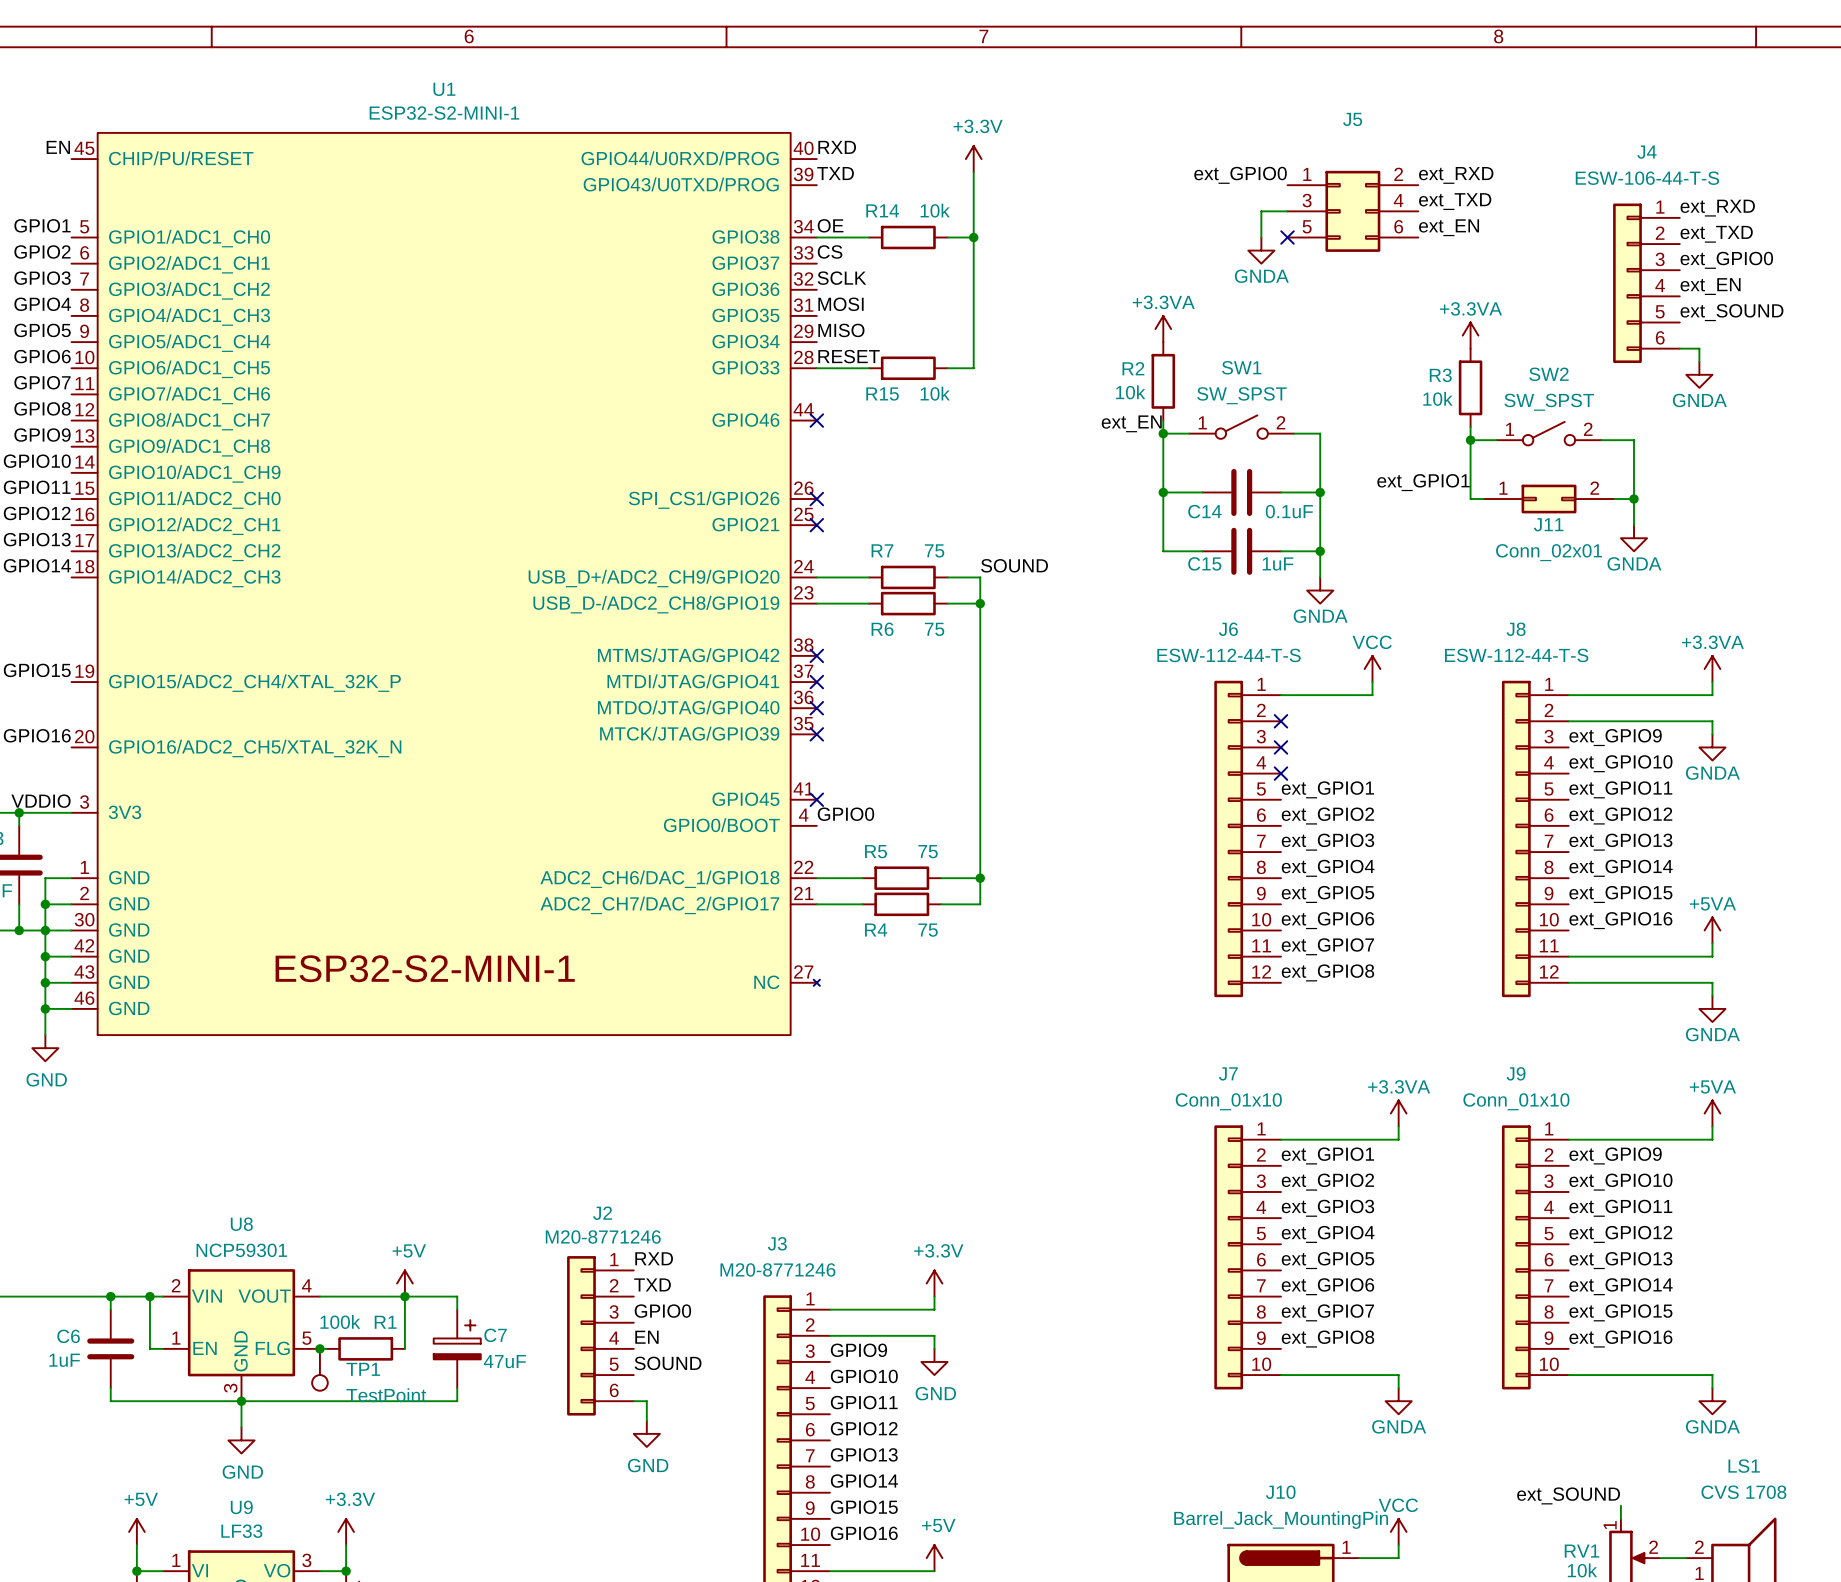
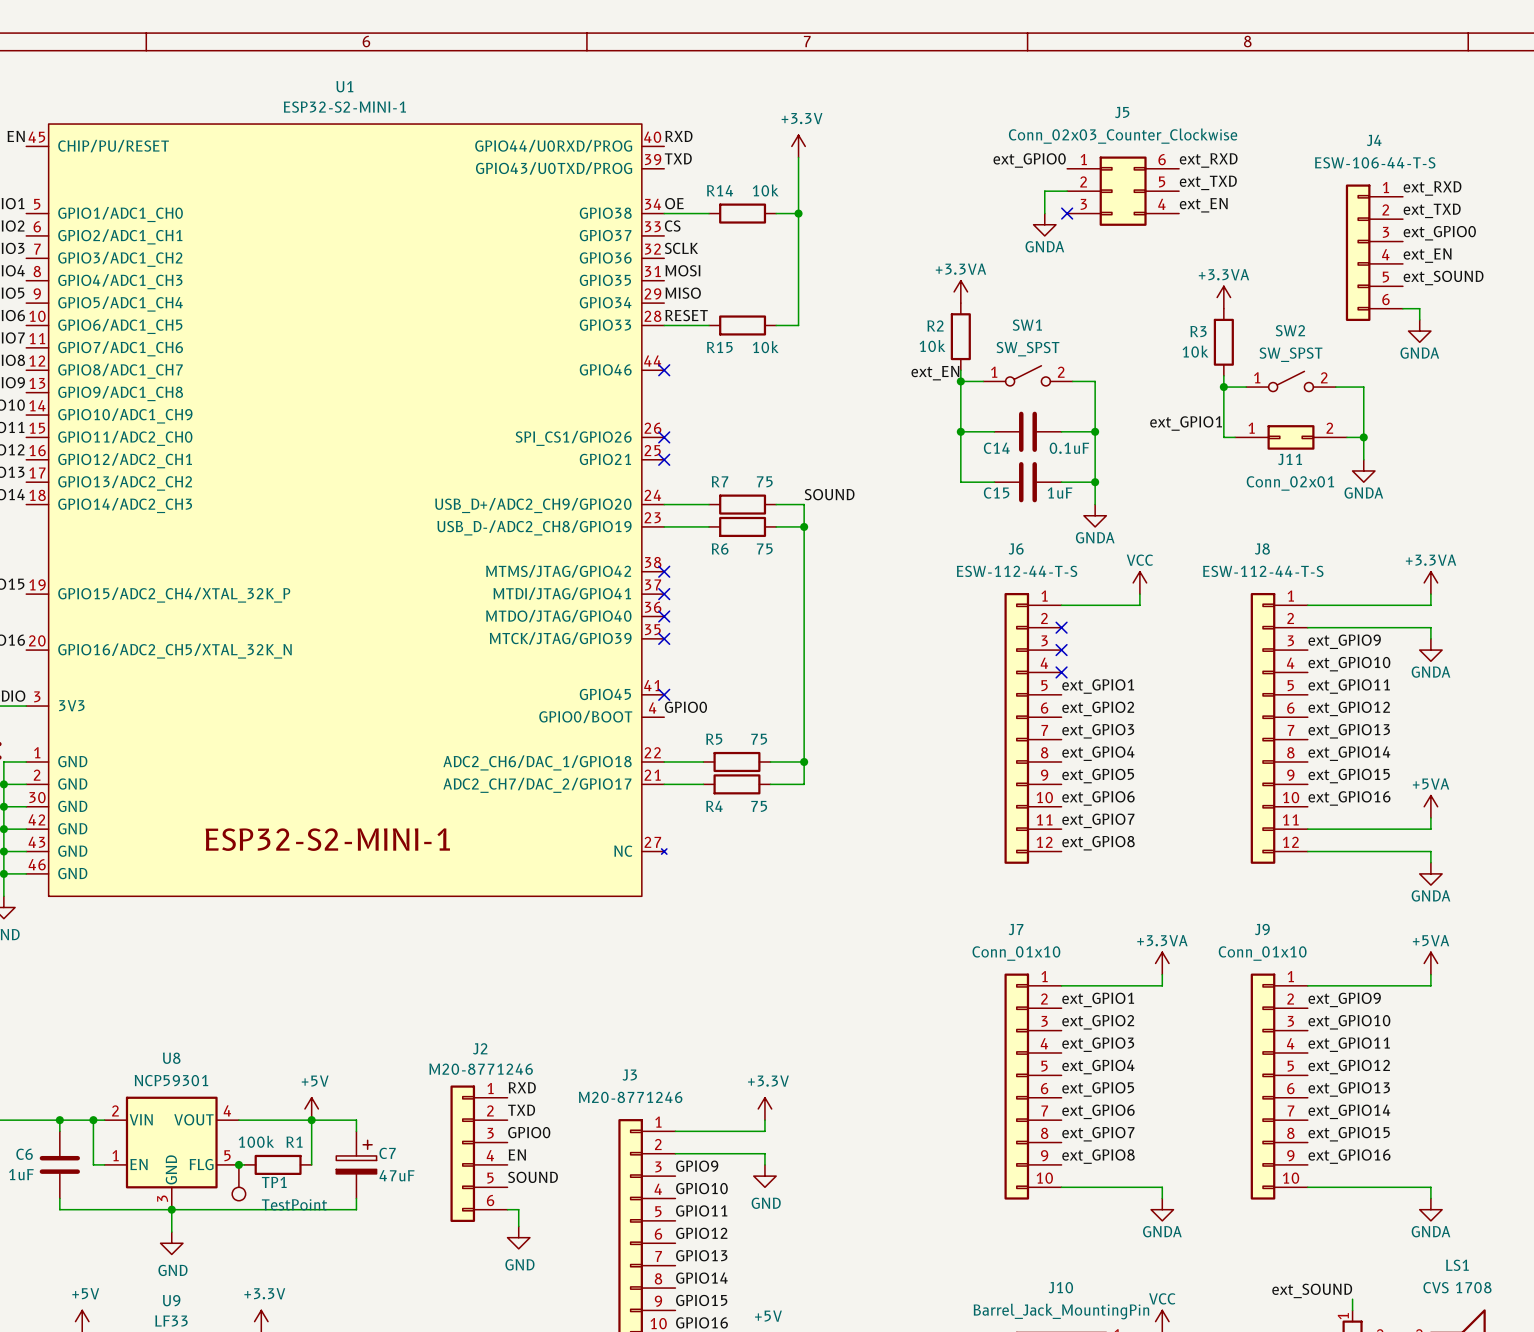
J5 value: none -> Conn_02x03_Counter_Clockwise (1123, 136)
J5 pin number: 2 (1398, 174) -> 6 (1162, 159)
J5 pin number: 3 (1307, 200) -> 2 (1083, 181)
J5 pin number: 4 (1398, 200) -> 5 (1162, 182)
J5 pin number: 5 (1307, 226) -> 3 (1083, 204)
J5 pin number: 6 (1398, 226) -> 4 (1161, 204)

